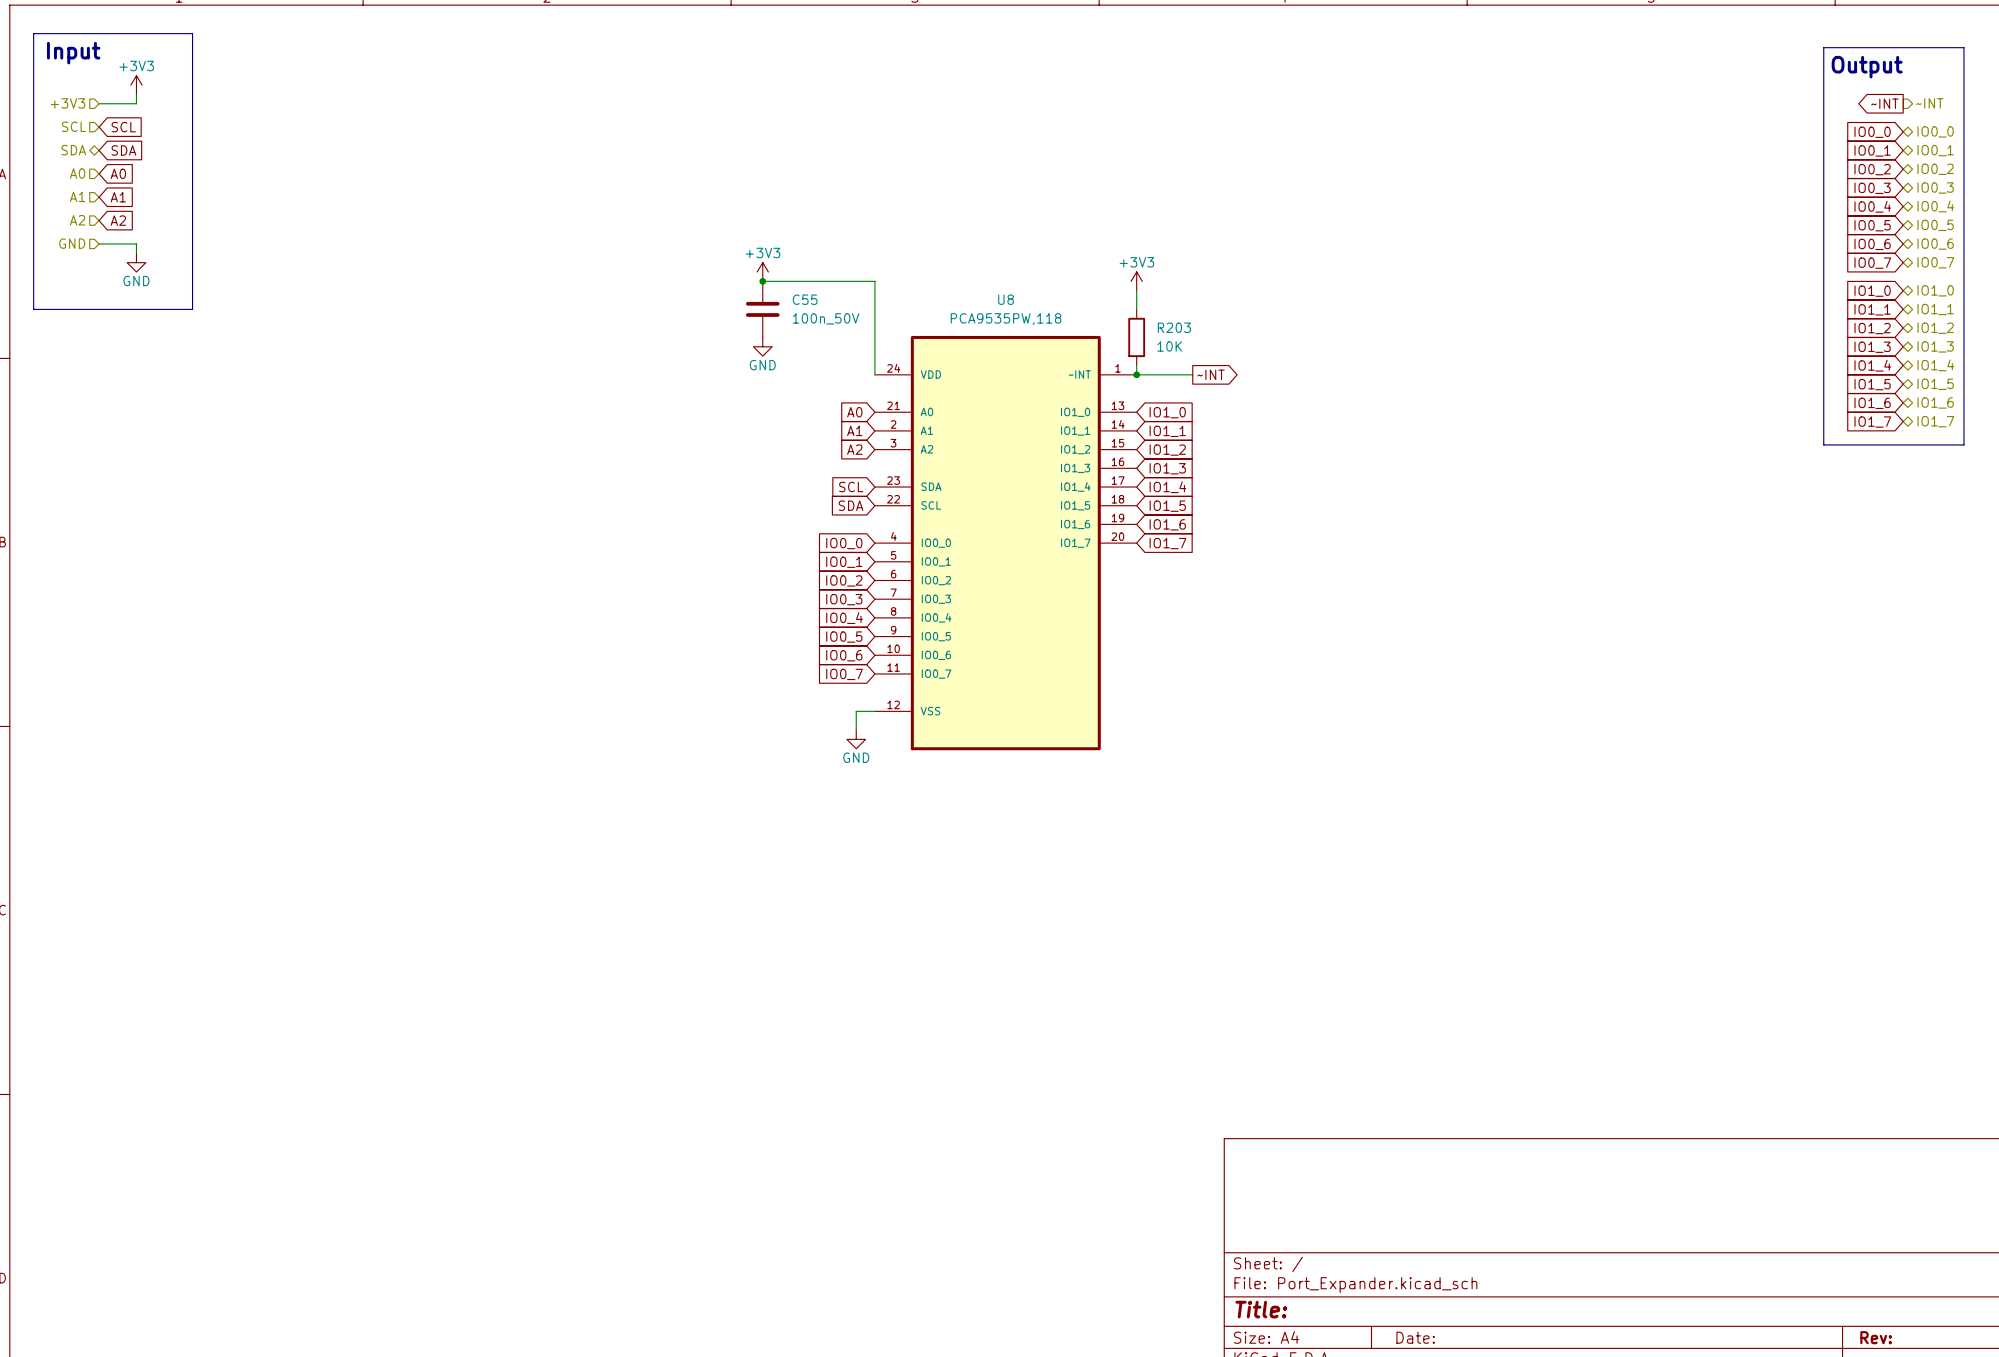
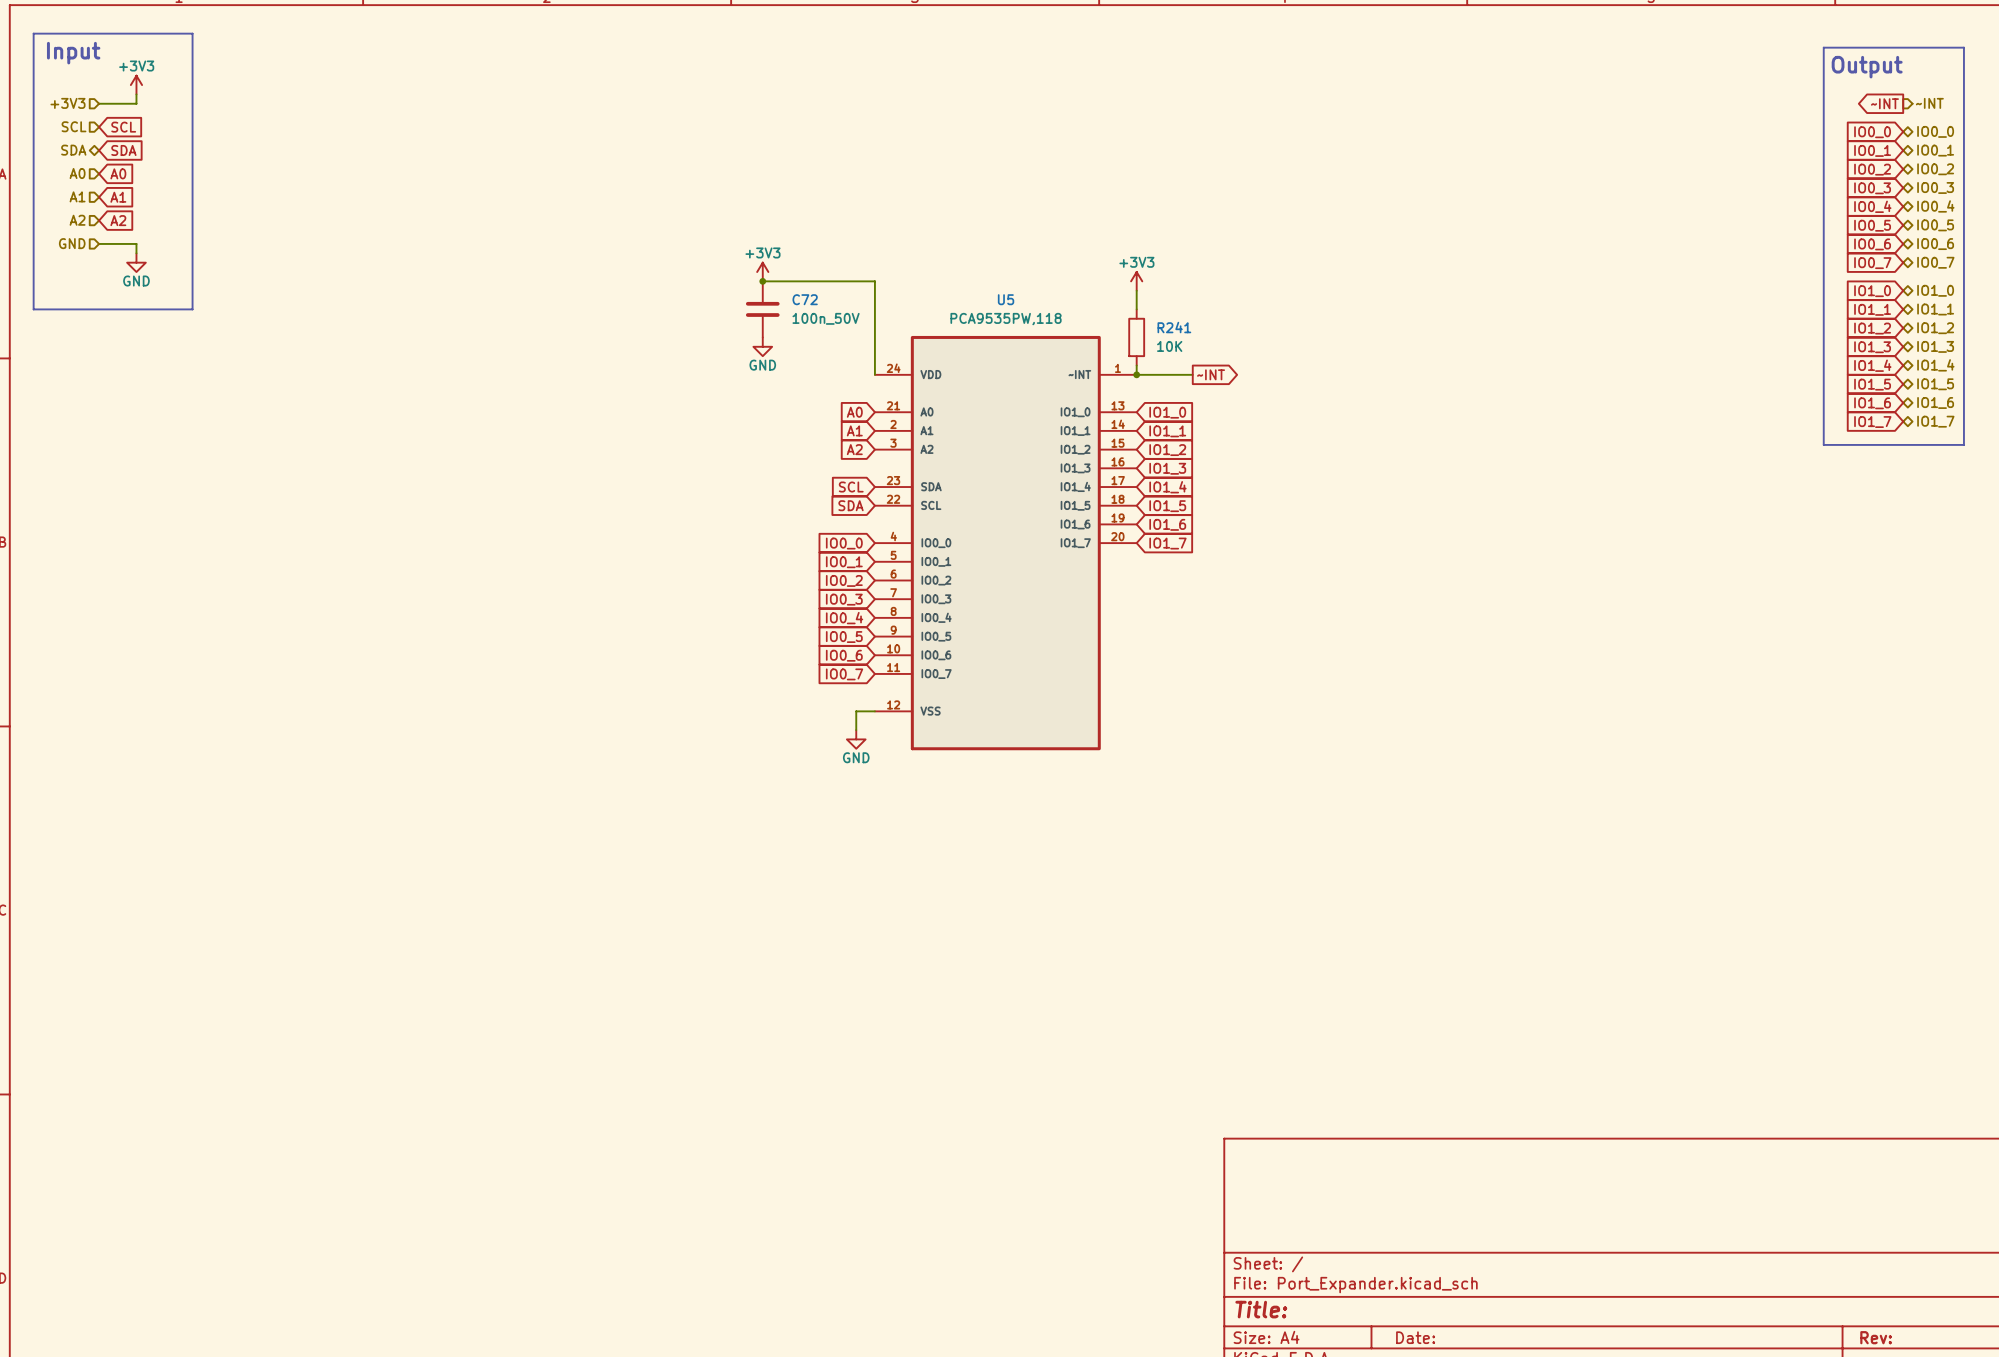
C55 name: C55 (805, 299) -> C72 (805, 299)
U8 name: U8 (1006, 299) -> U5 (1006, 299)
R203 name: R203 (1174, 327) -> R241 (1174, 327)

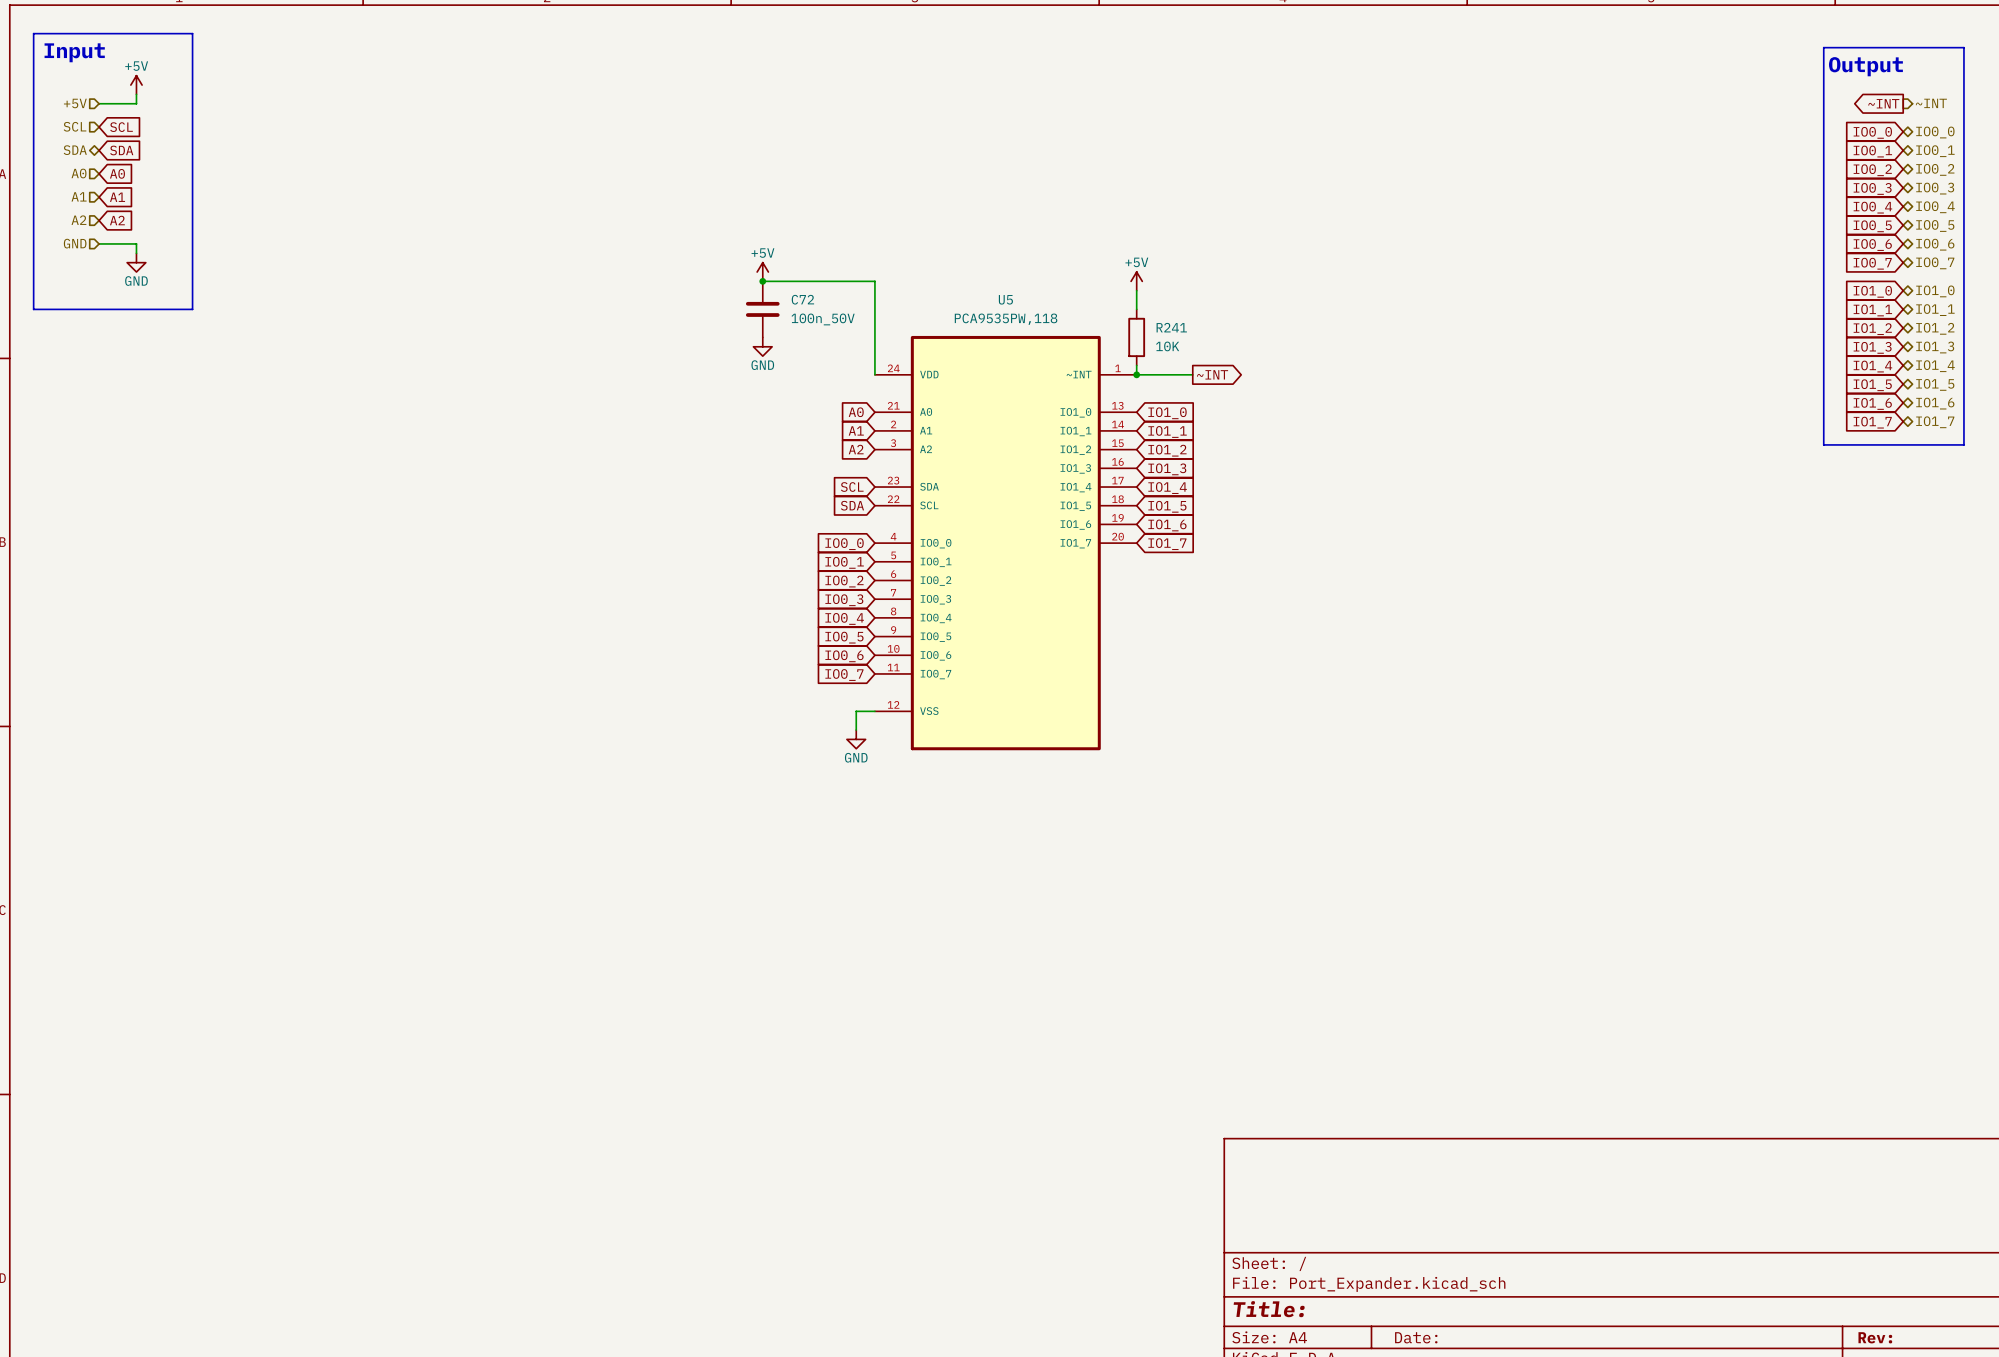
power symbol: +3V3 (136, 85) -> +5V (136, 85)
hierarchical label: +3V3 (67, 103) -> +5V (75, 103)
power symbol: +3V3 (762, 272) -> +5V (762, 272)
power symbol: +3V3 (1136, 281) -> +5V (1136, 281)

